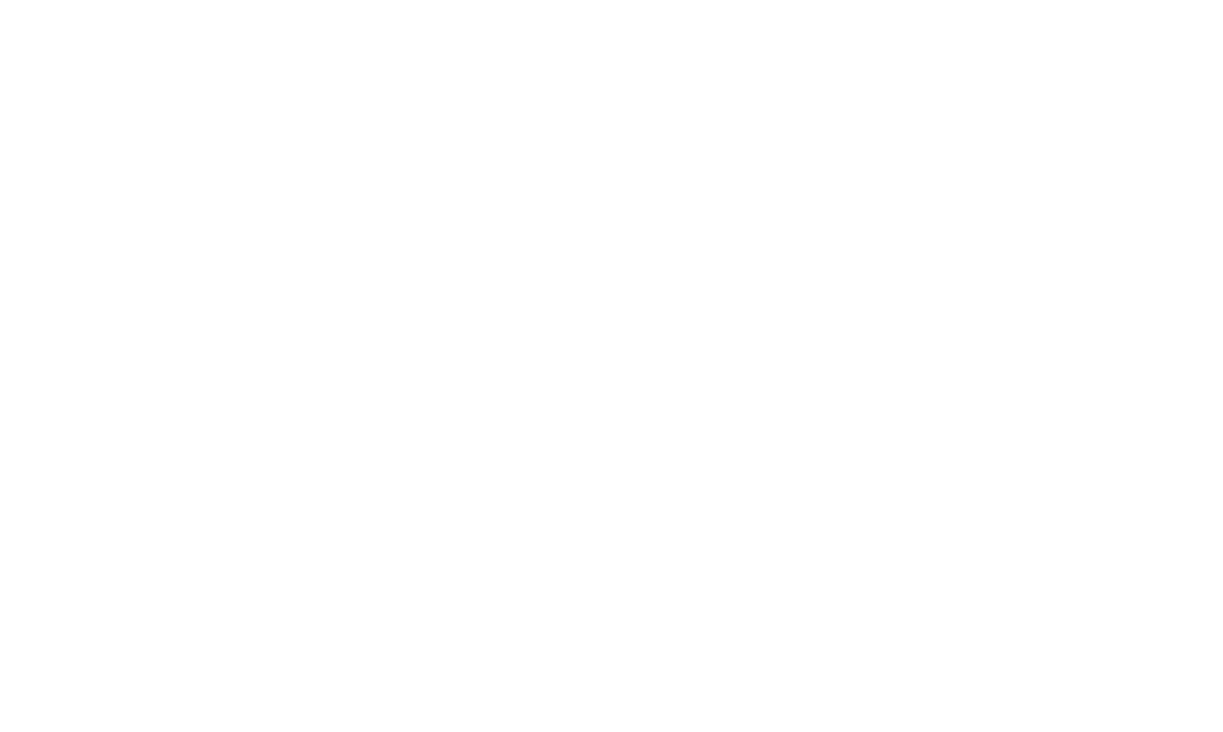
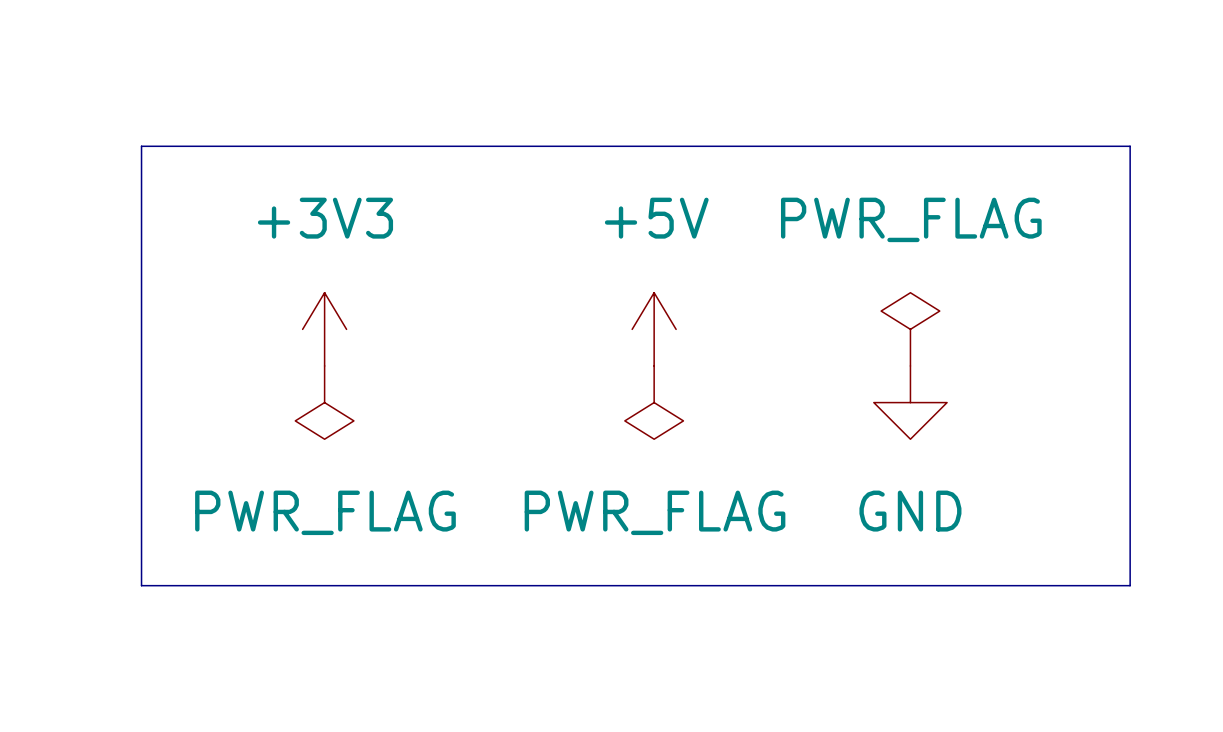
line: none -> (141, 146) (1130, 146) (1130, 585) (141, 585) (141, 146)
power symbol: none -> +3V3 (324, 329)
power symbol: none -> +5V (654, 329)
power symbol: none -> PWR_FLAG (910, 329)
power symbol: none -> PWR_FLAG (324, 402)
power symbol: none -> PWR_FLAG (654, 402)
power symbol: none -> GND (910, 402)

